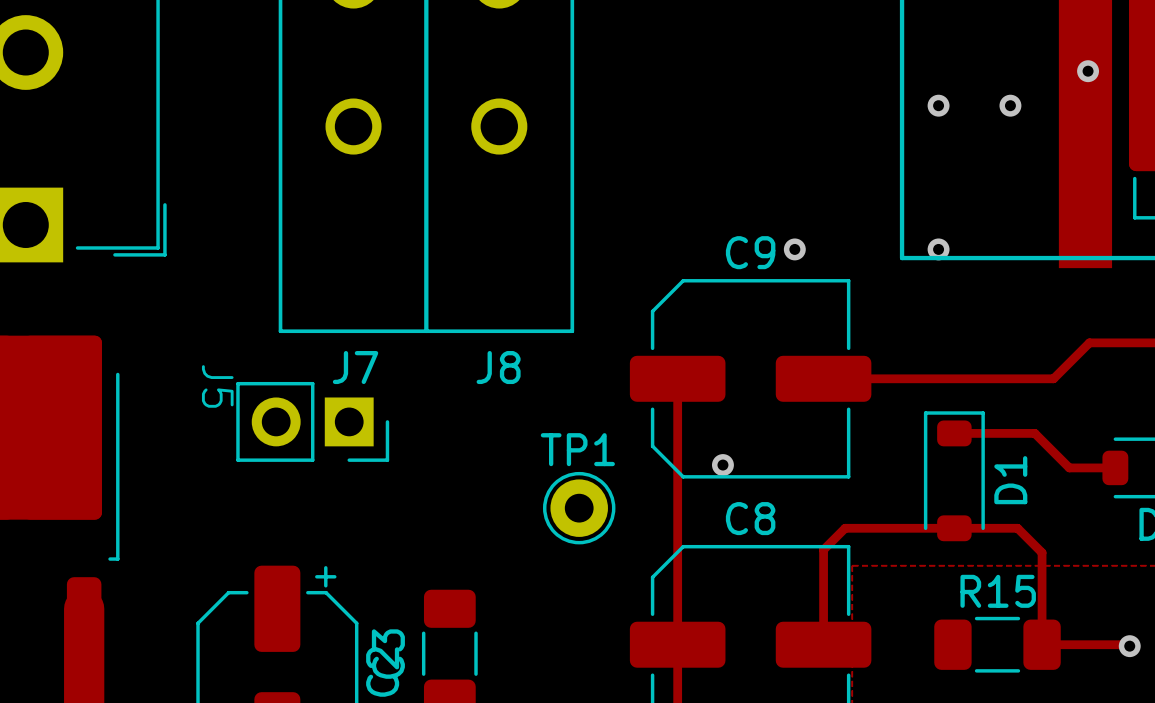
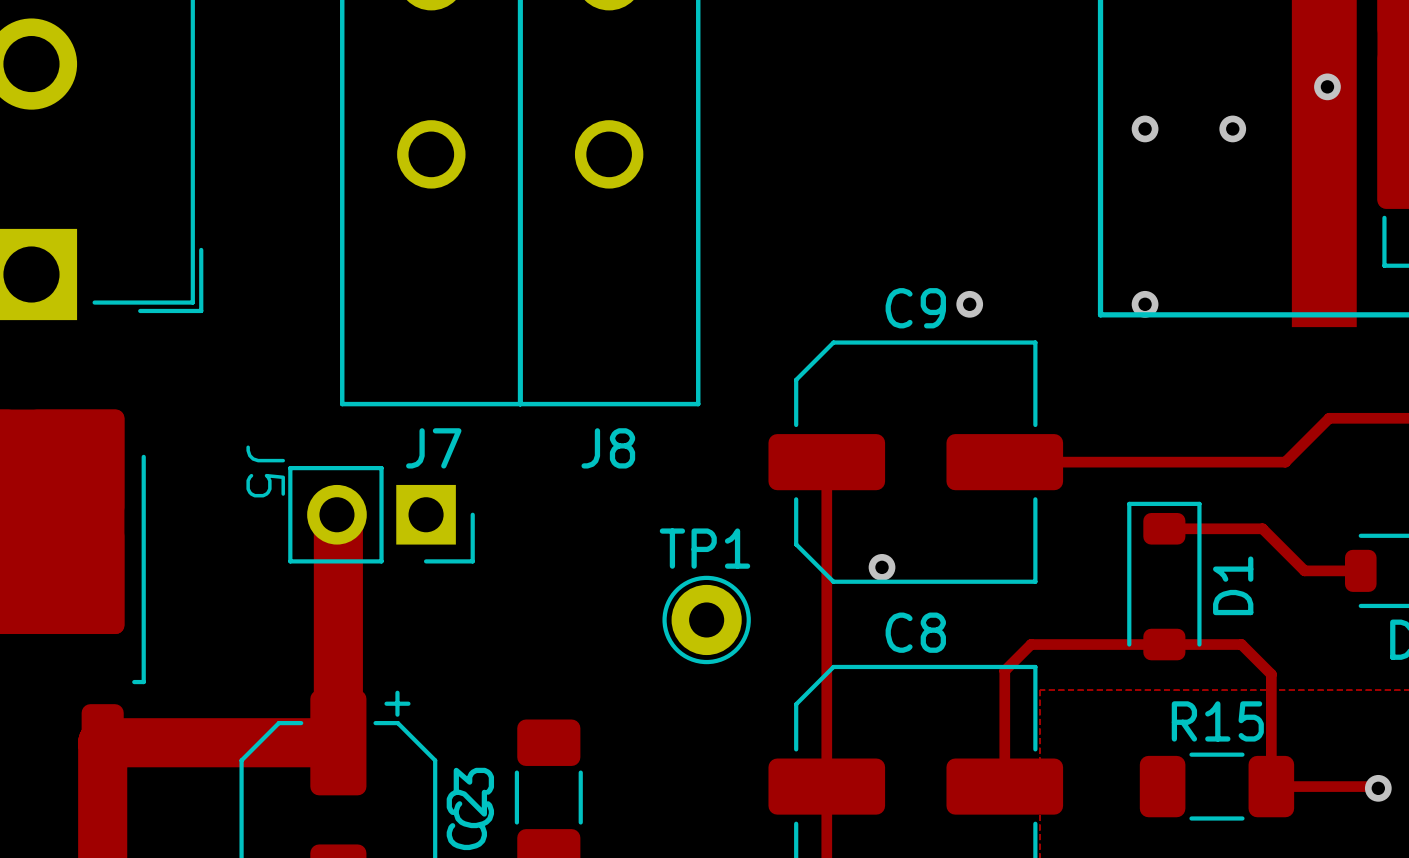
track: none -> (336, 514) (338, 742) (102, 742)

